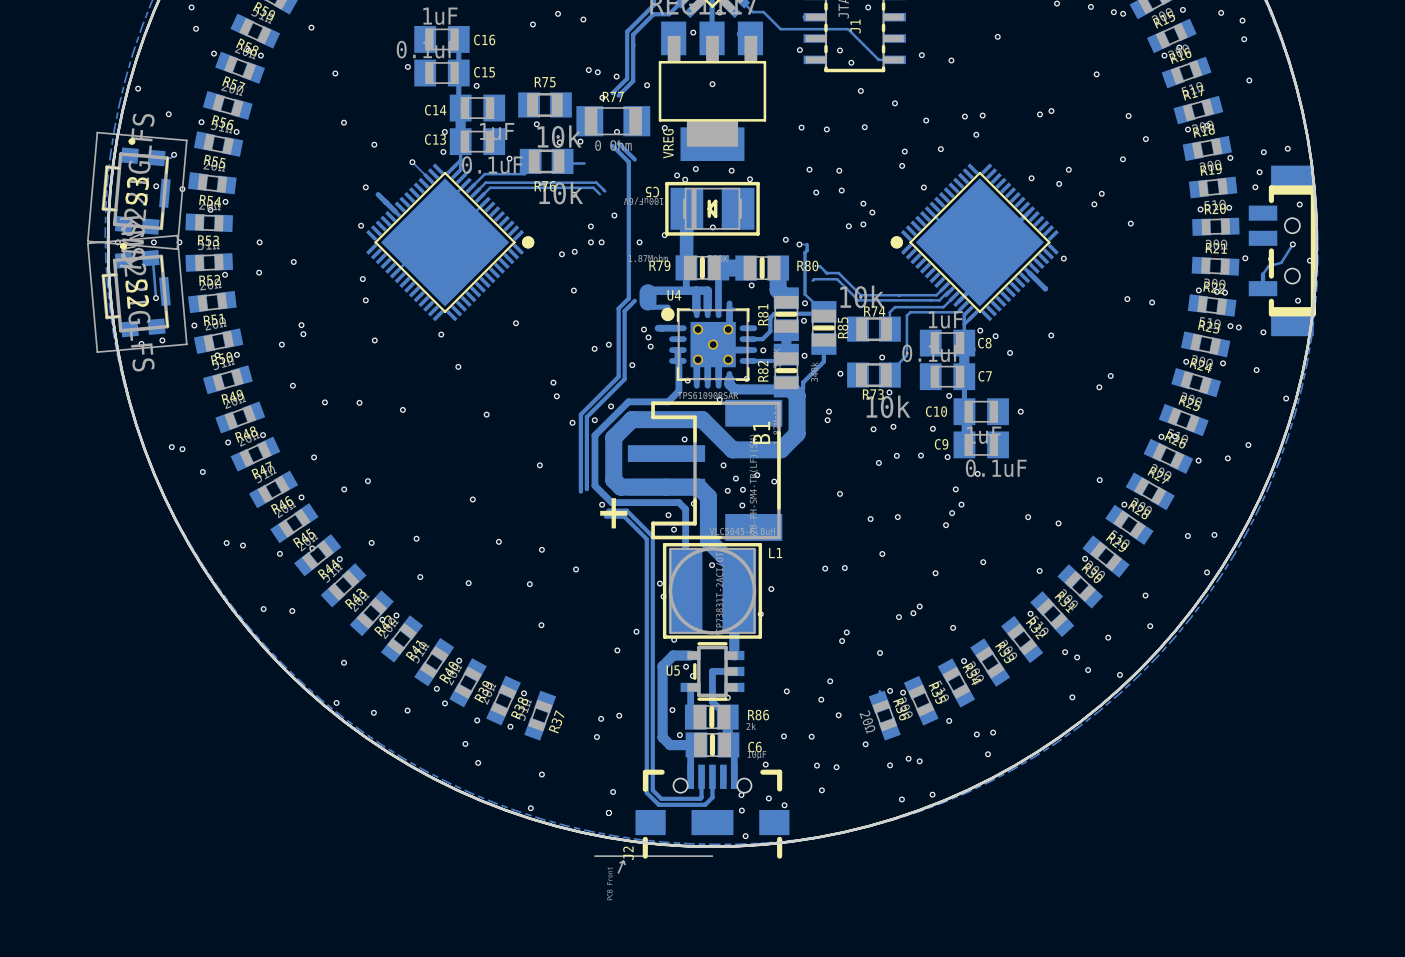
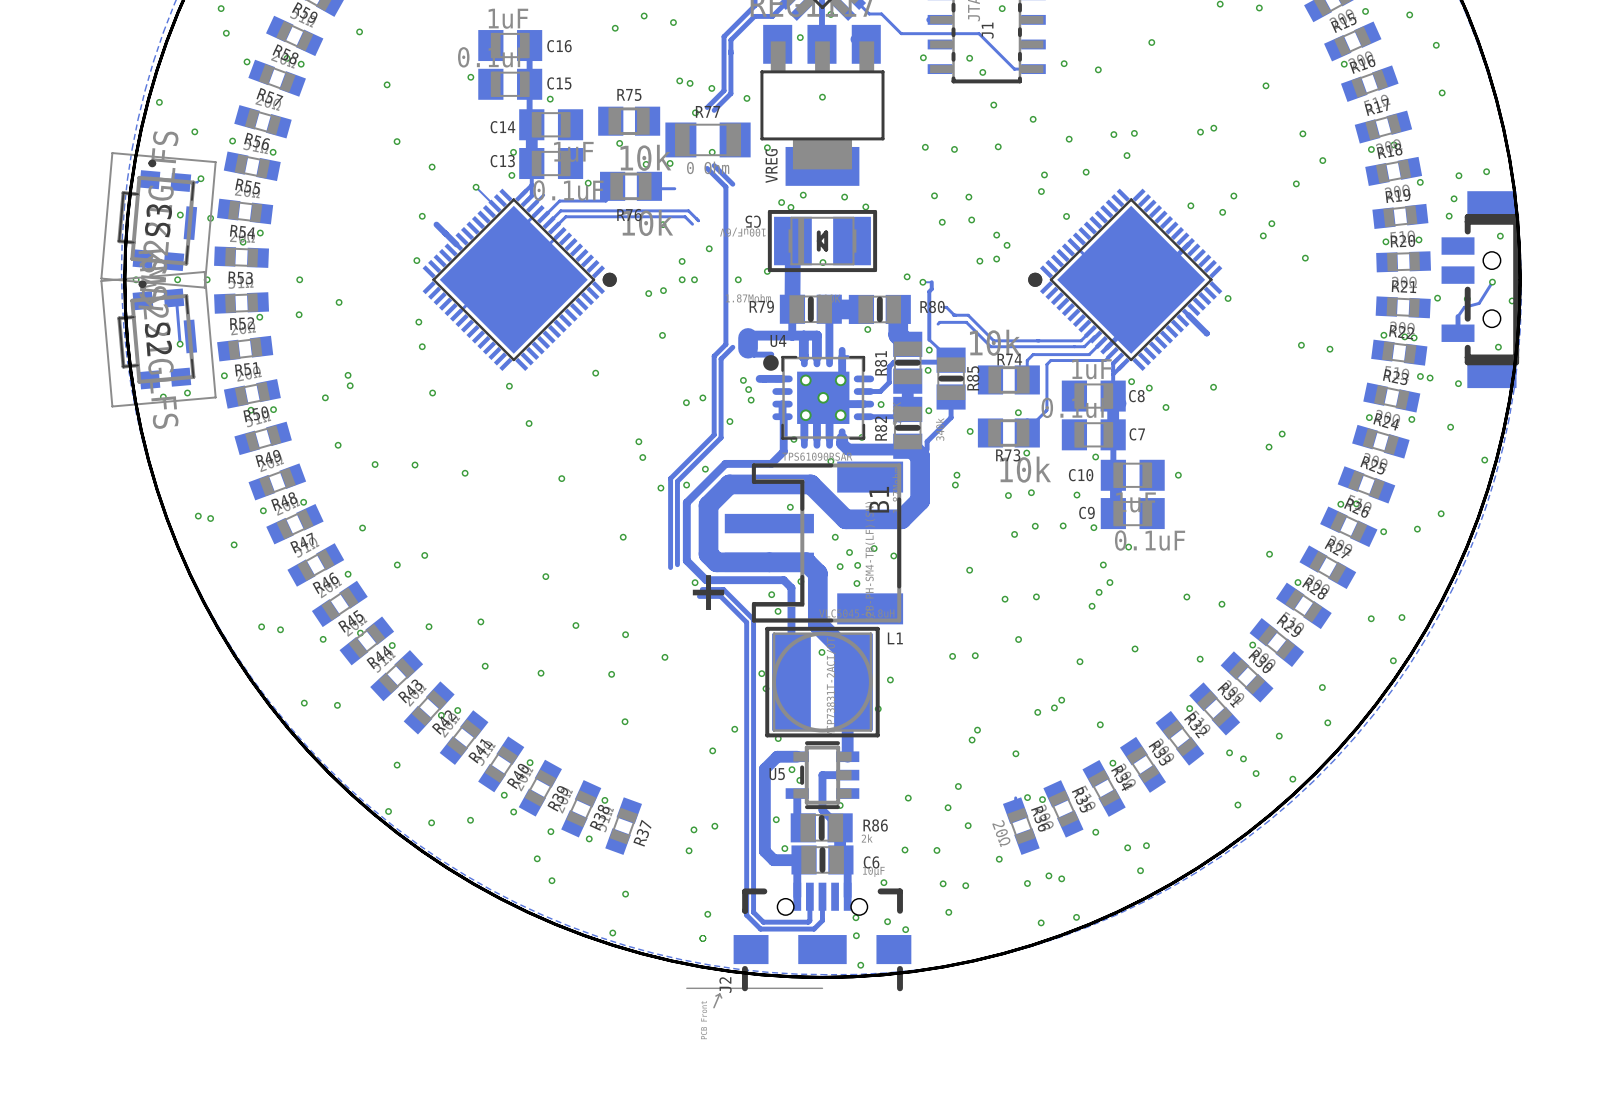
via: (1113, 12) -> none
via: (1123, 13) -> none
via: (1242, 20) -> none
via: (1179, 47) -> none

